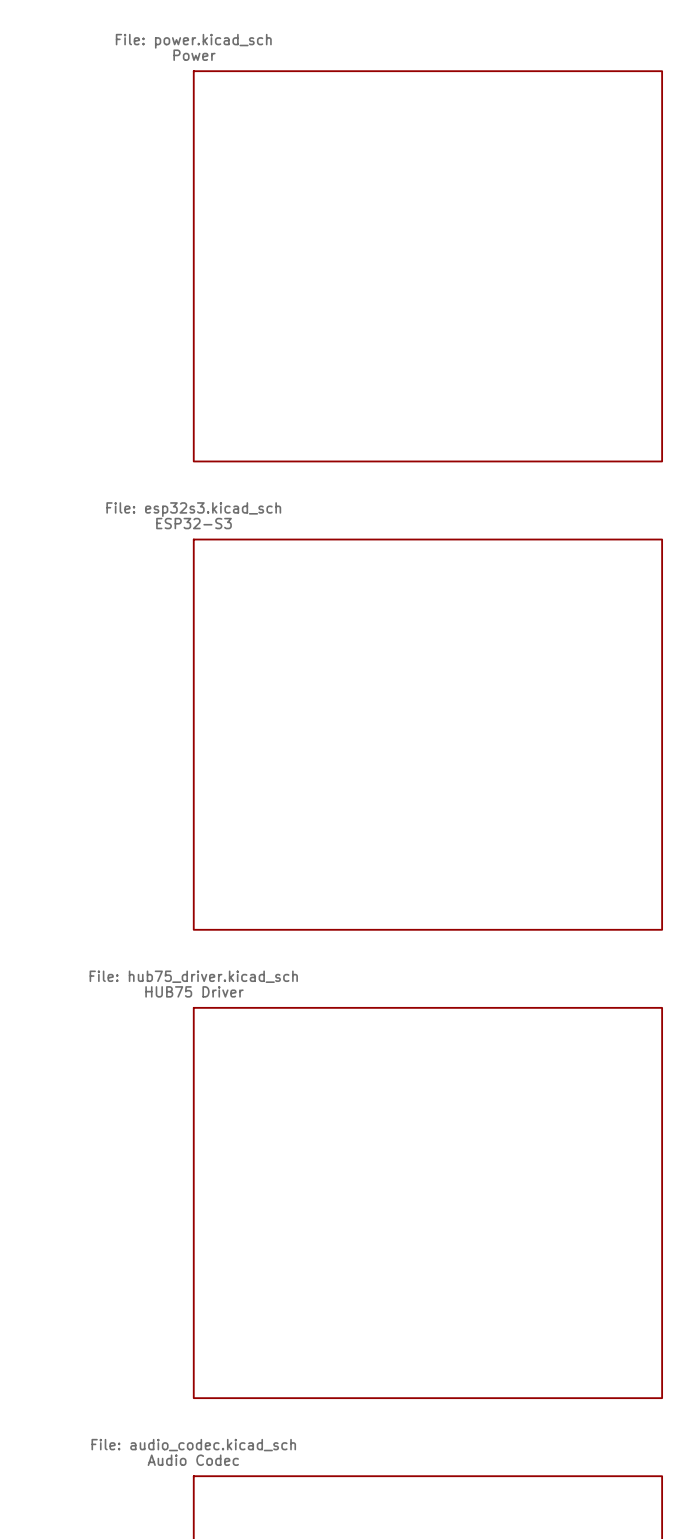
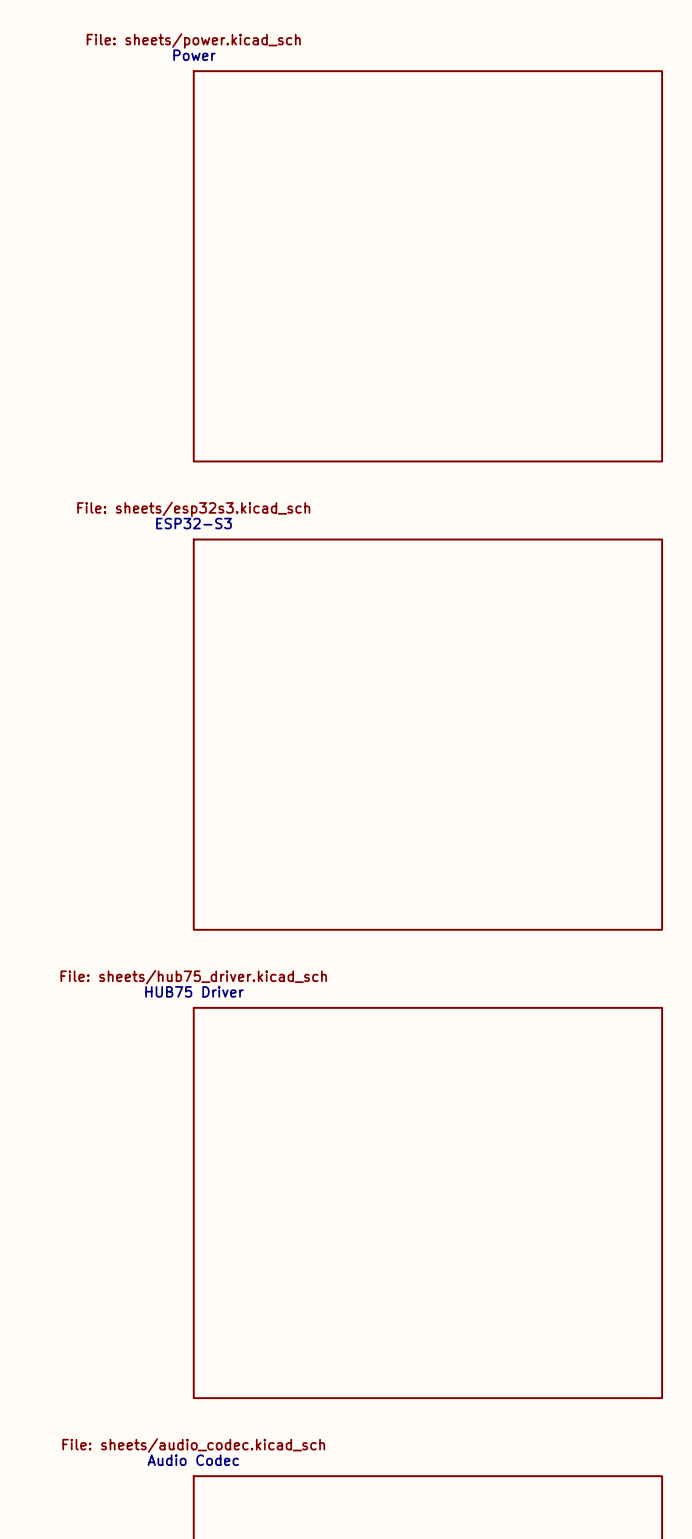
sheet Power value: File: power.kicad_sch (193, 41) -> File: sheets/power.kicad_sch (193, 41)
sheet ESP32-S3 value: File: esp32s3.kicad_sch (193, 509) -> File: sheets/esp32s3.kicad_sch (193, 509)
sheet HUB75 Driver value: File: hub75_driver.kicad_sch (193, 976) -> File: sheets/hub75_driver.kicad_sch (193, 977)
sheet Audio Codec value: File: audio_codec.kicad_sch (193, 1445) -> File: sheets/audio_codec.kicad_sch (193, 1445)

